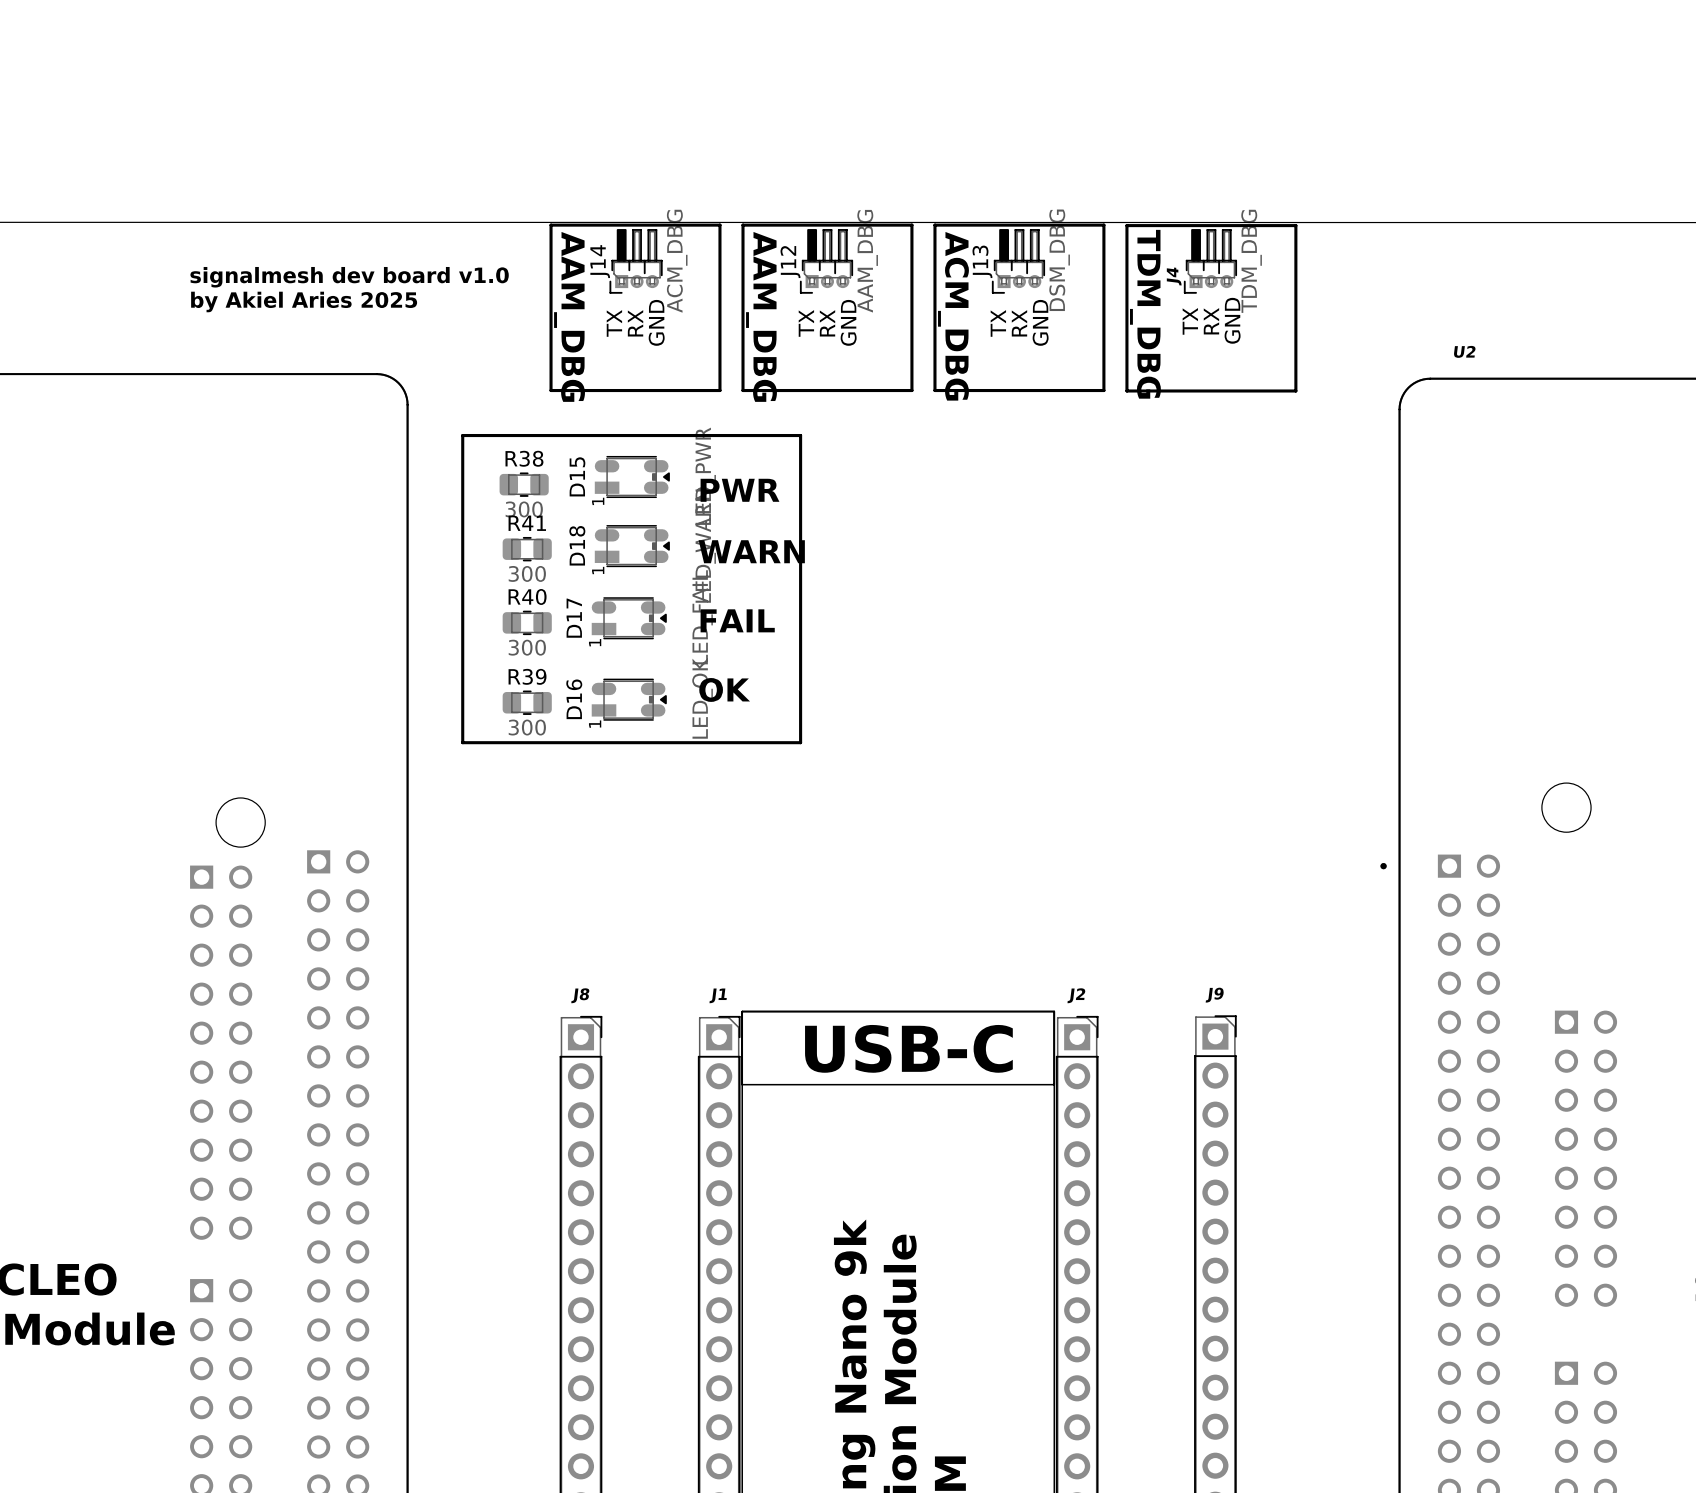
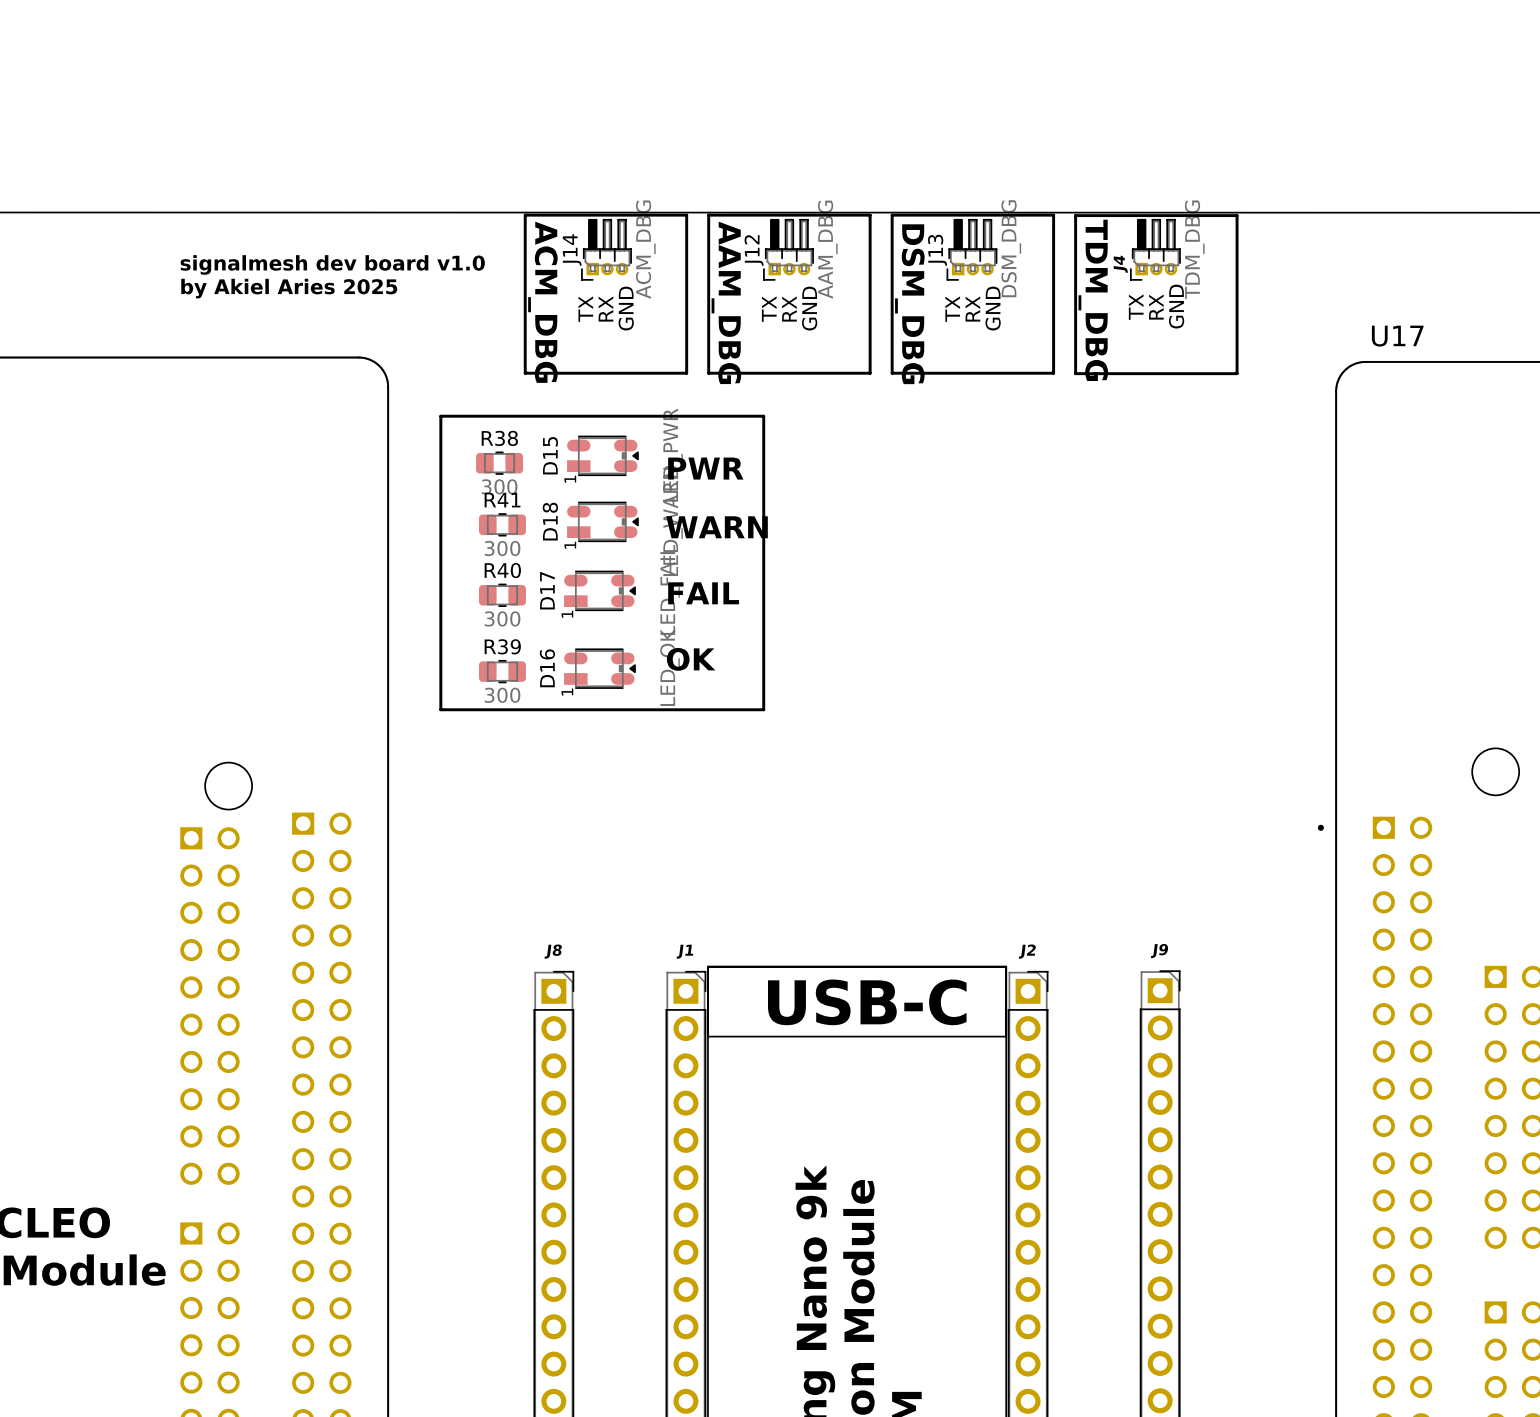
text: AAM_DBG (569, 316) -> ACM_DBG (542, 302)
text: ACM_DBG (953, 316) -> DSM_DBG (909, 304)
U2 name: U2 (1464, 351) -> U17 (1397, 336)

